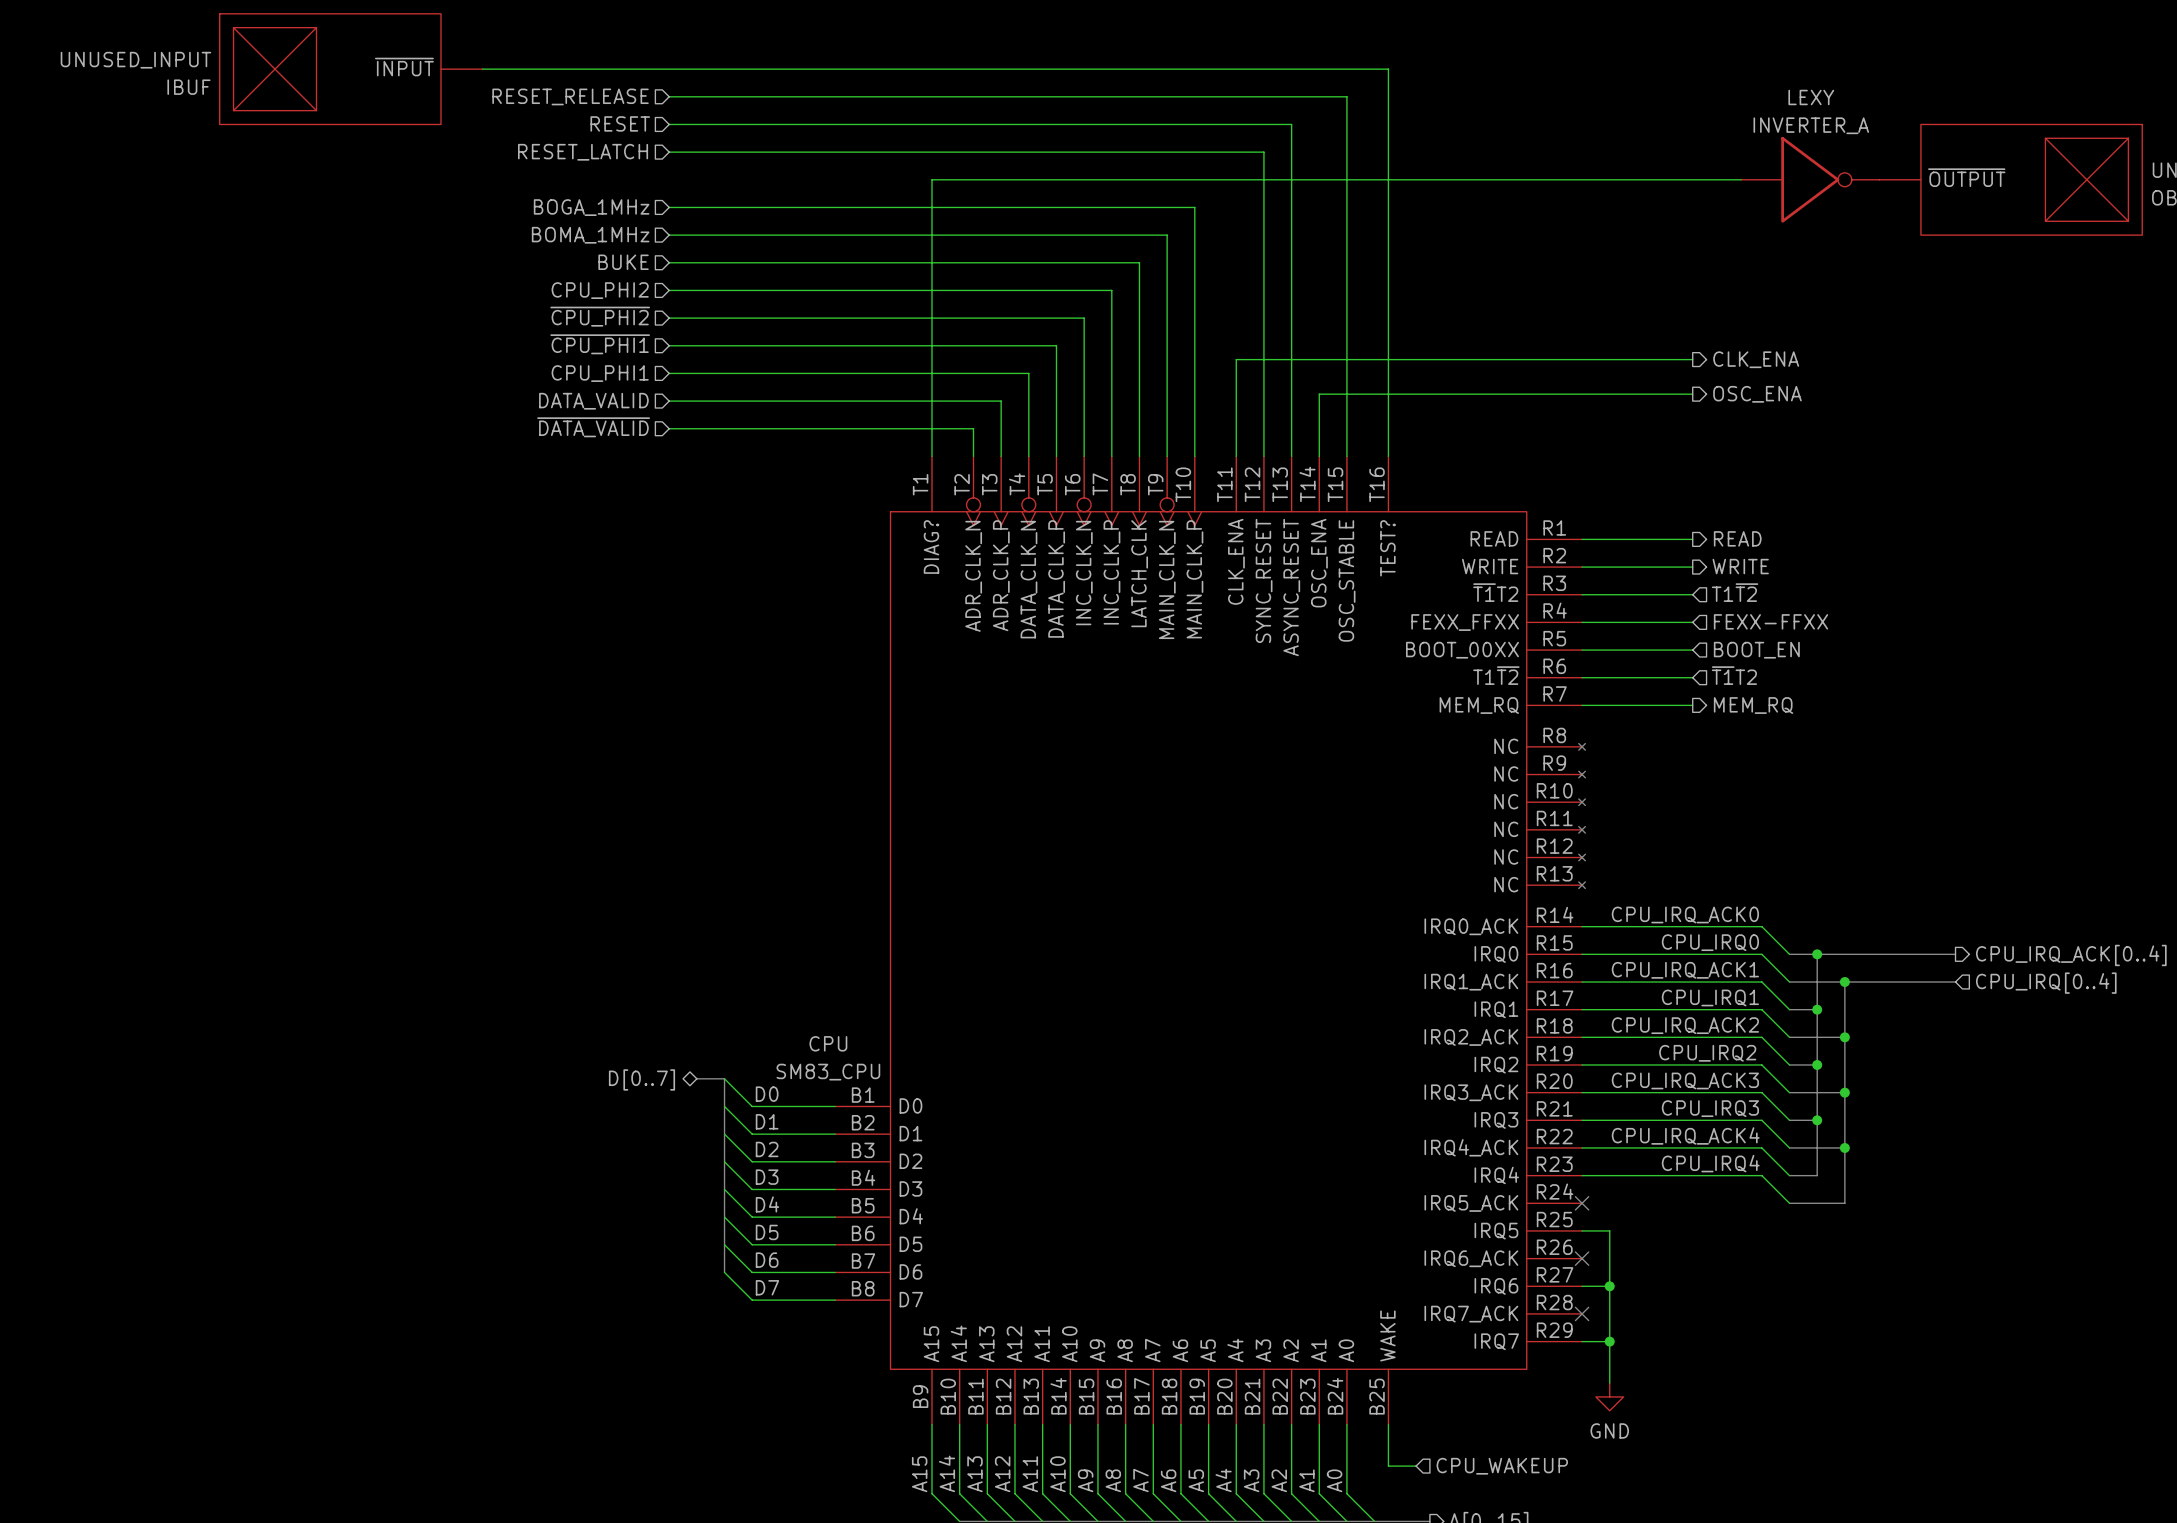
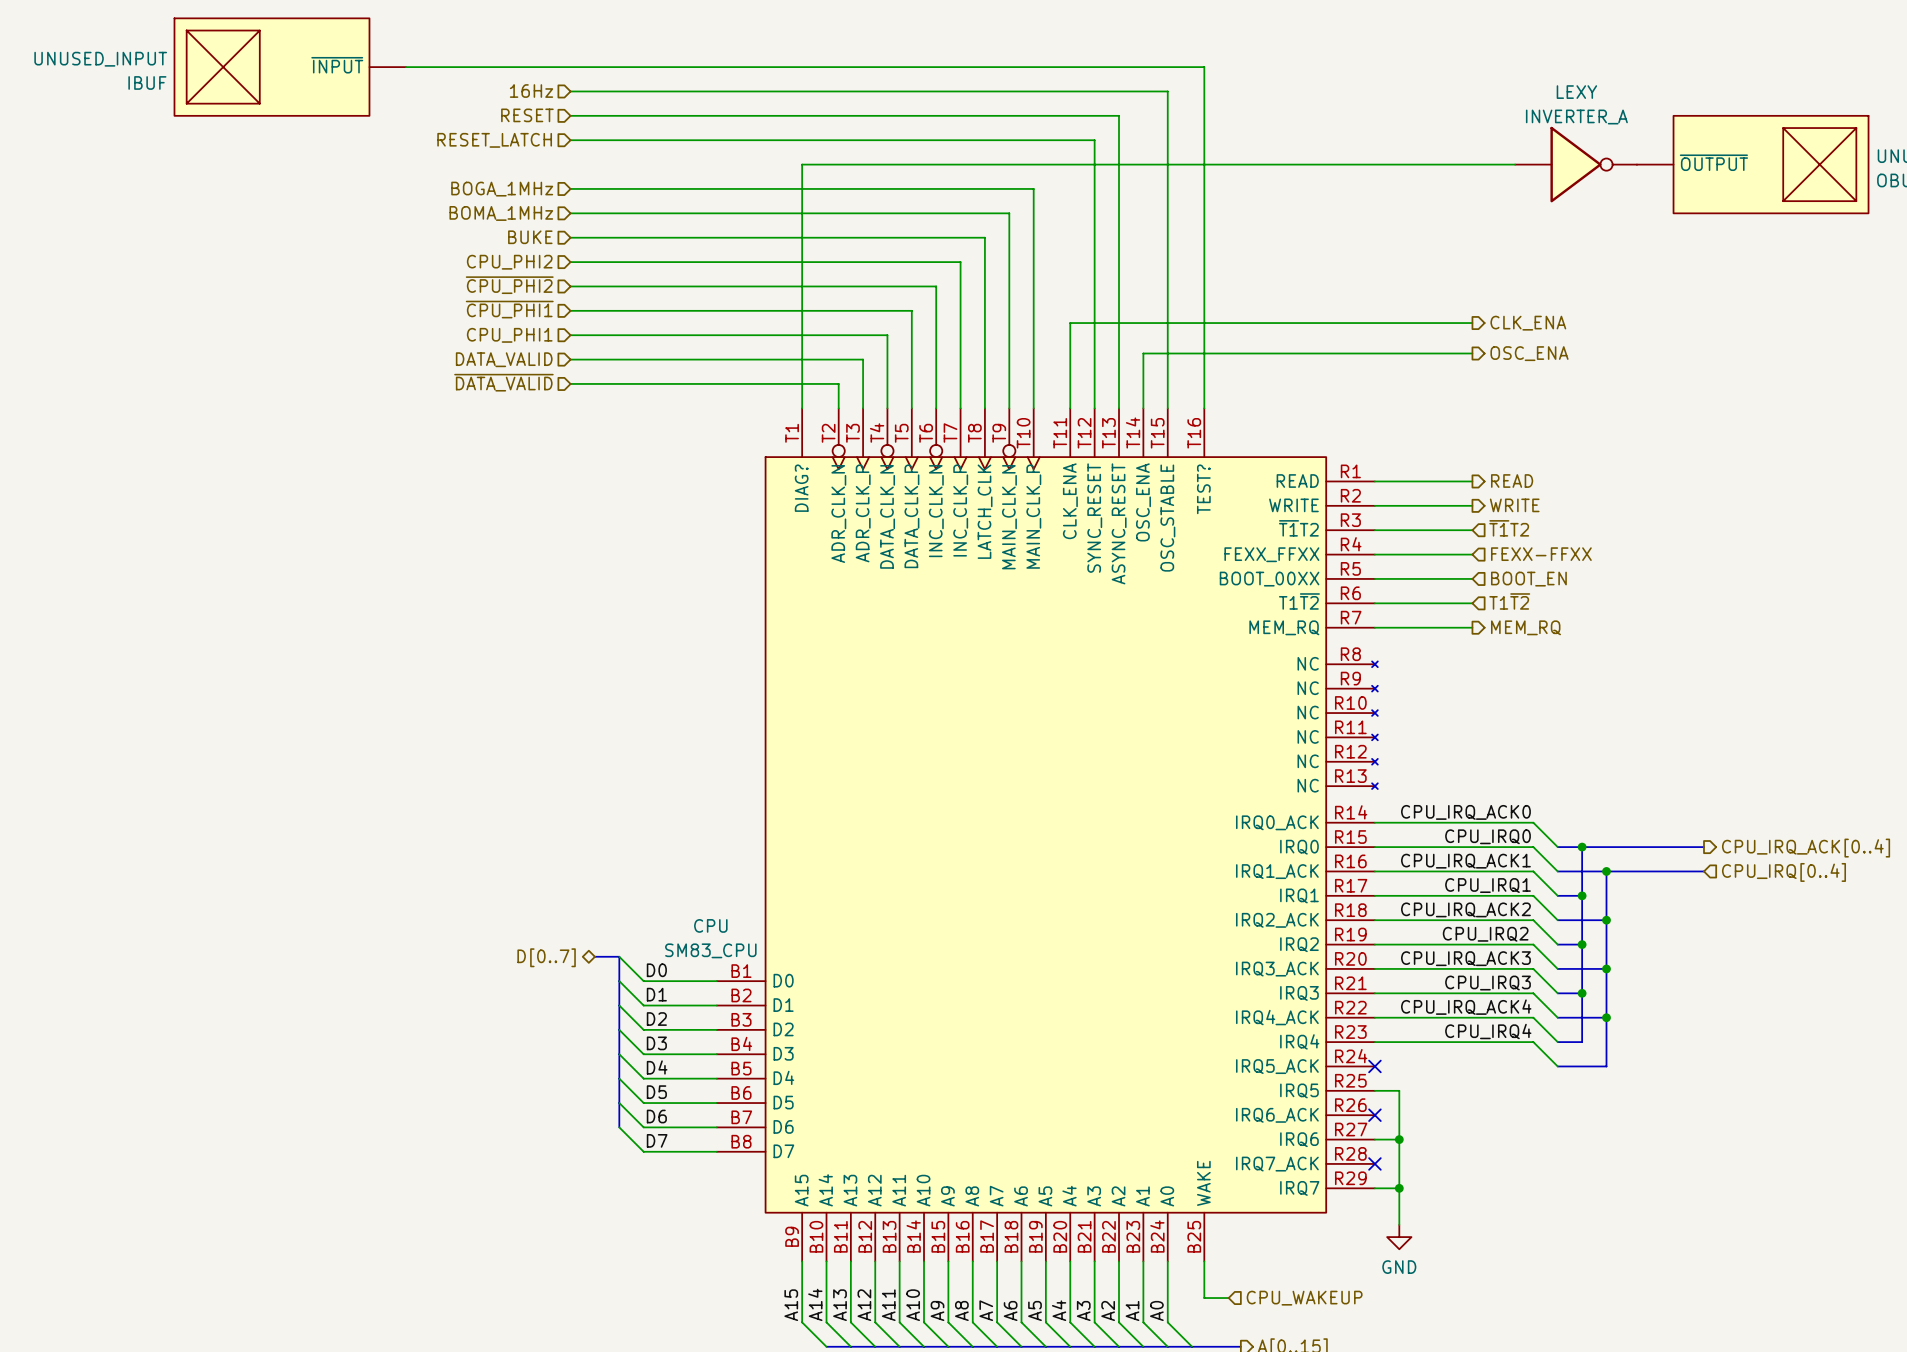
hierarchical label: RESET_RELEASE (570, 96) -> 16Hz (531, 91)
hierarchical label: T1~{T2} (1735, 592) -> ~{T1}T2 (1509, 528)
hierarchical label: ~{T1}T2 (1734, 675) -> T1~{T2} (1509, 601)

